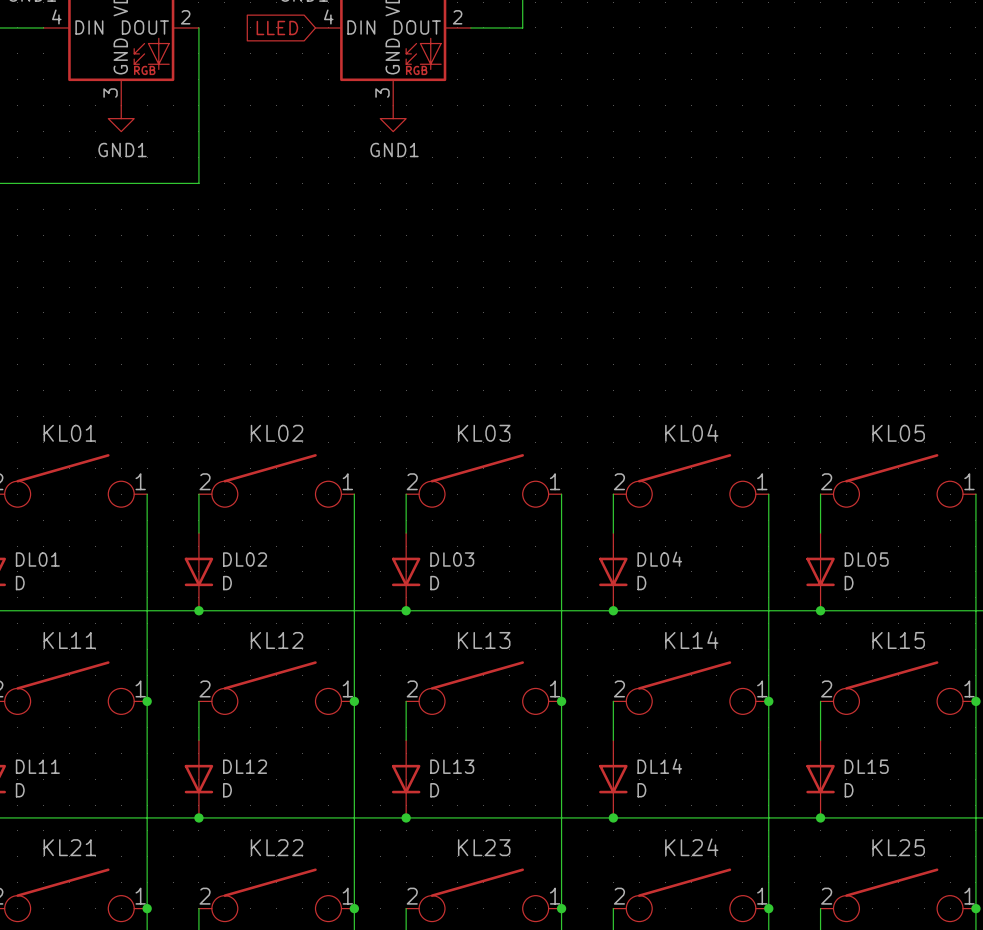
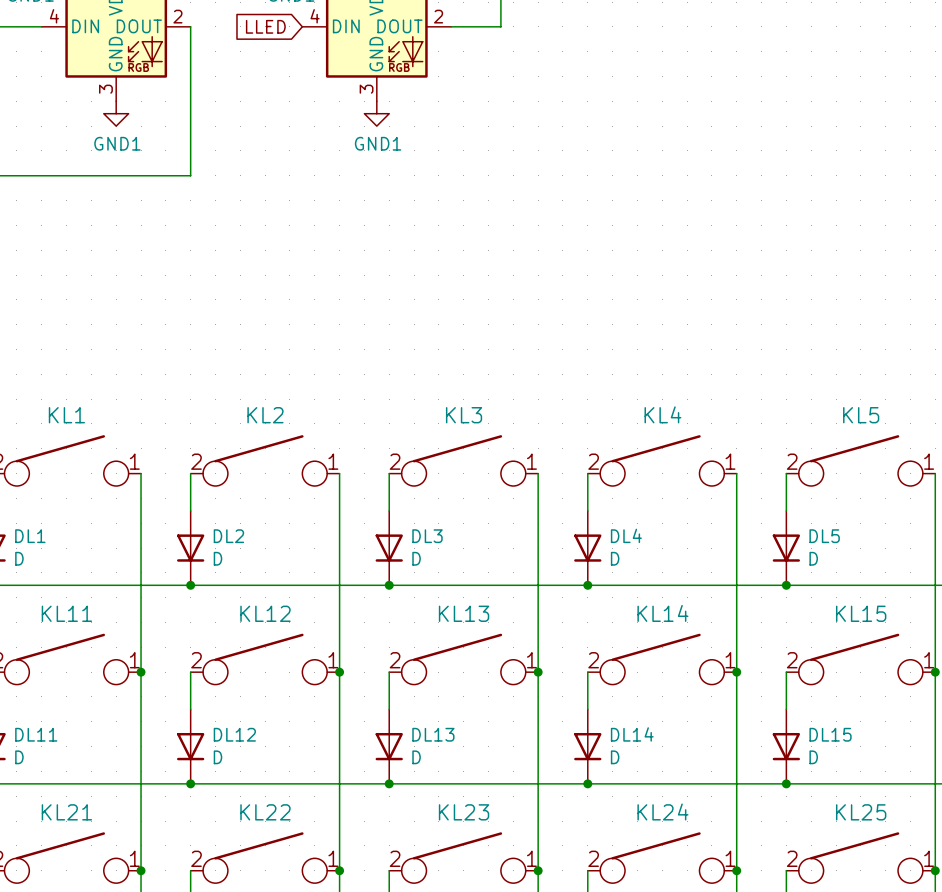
KL04 name: KL04 (691, 432) -> KL4 (662, 414)
KL01 name: KL01 (69, 433) -> KL1 (66, 415)
KL02 name: KL02 (277, 433) -> KL2 (265, 415)
KL03 name: KL03 (484, 433) -> KL3 (464, 415)
KL05 name: KL05 (898, 433) -> KL5 (861, 415)
DL01 name: DL01 (37, 559) -> DL1 (30, 536)
DL02 name: DL02 (245, 559) -> DL2 (228, 536)
DL03 name: DL03 (452, 559) -> DL3 (427, 536)
DL04 name: DL04 (659, 559) -> DL4 (626, 535)
DL05 name: DL05 (866, 559) -> DL5 (824, 536)

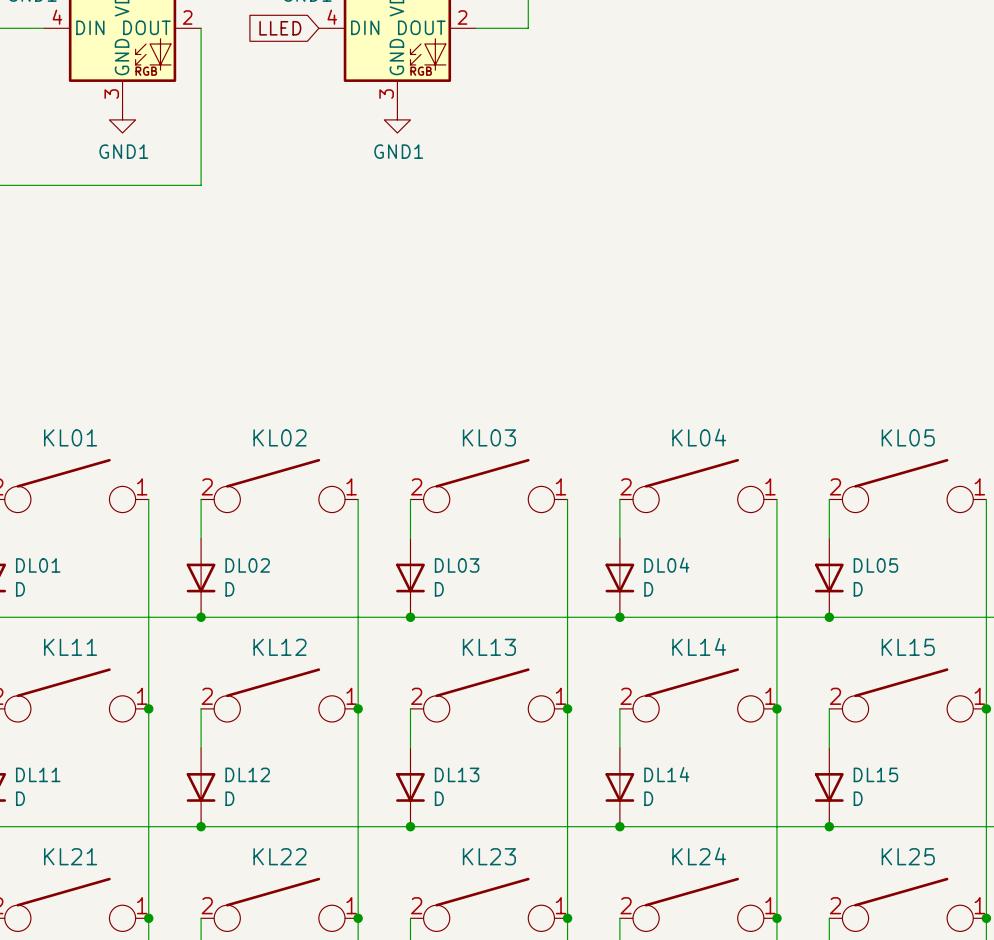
KL4 name: KL4 (662, 414) -> KL04 (699, 437)
KL1 name: KL1 (66, 415) -> KL01 (70, 437)
KL2 name: KL2 (265, 415) -> KL02 (279, 437)
KL3 name: KL3 (464, 415) -> KL03 (489, 437)
KL5 name: KL5 (861, 415) -> KL05 (908, 437)
DL4 name: DL4 (626, 535) -> DL04 (666, 565)
DL1 name: DL1 (30, 536) -> DL01 (38, 565)
DL2 name: DL2 (228, 536) -> DL02 (247, 565)
DL3 name: DL3 (427, 536) -> DL03 (457, 565)
DL5 name: DL5 (824, 536) -> DL05 (875, 565)

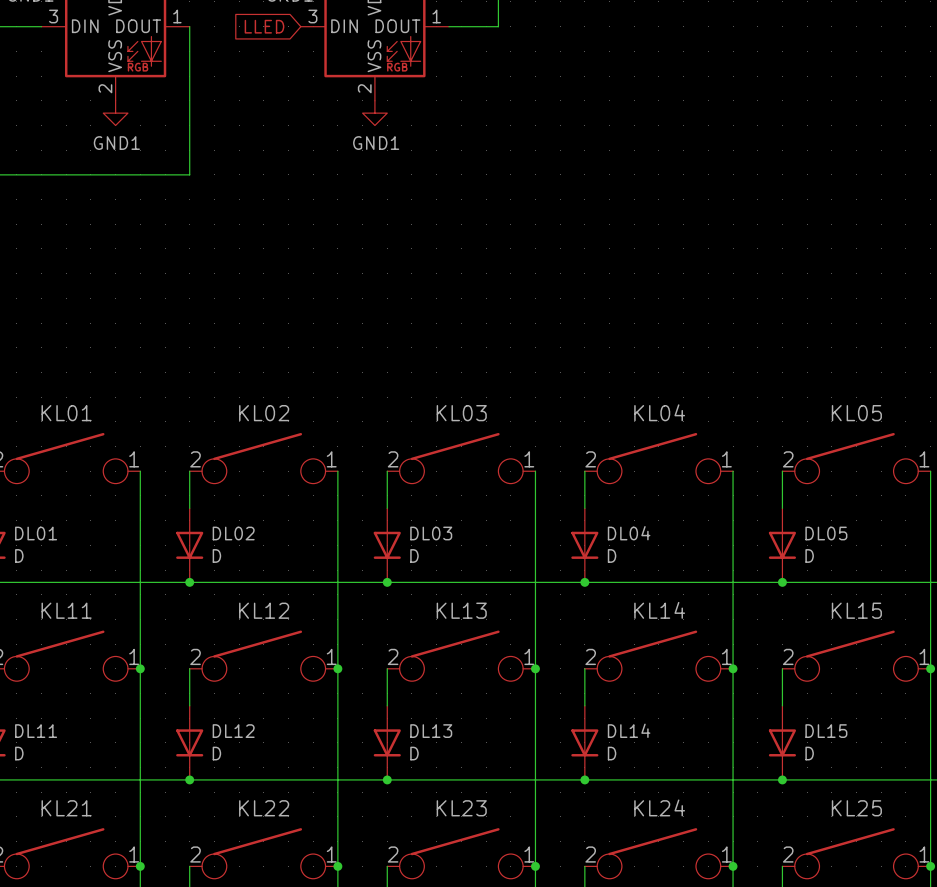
part pin number: 4 (57, 17) -> 3 (53, 16)
part pin number: 2 (187, 17) -> 1 (177, 16)
part pin number: 4 (332, 17) -> 3 (312, 16)
part pin number: 2 (462, 17) -> 1 (436, 16)
part pin name: GND (122, 57) -> VSS (115, 56)
part pin name: GND (396, 57) -> VSS (374, 56)
part pin number: 3 (111, 94) -> 2 (105, 88)
part pin number: 3 (386, 94) -> 2 (364, 88)

